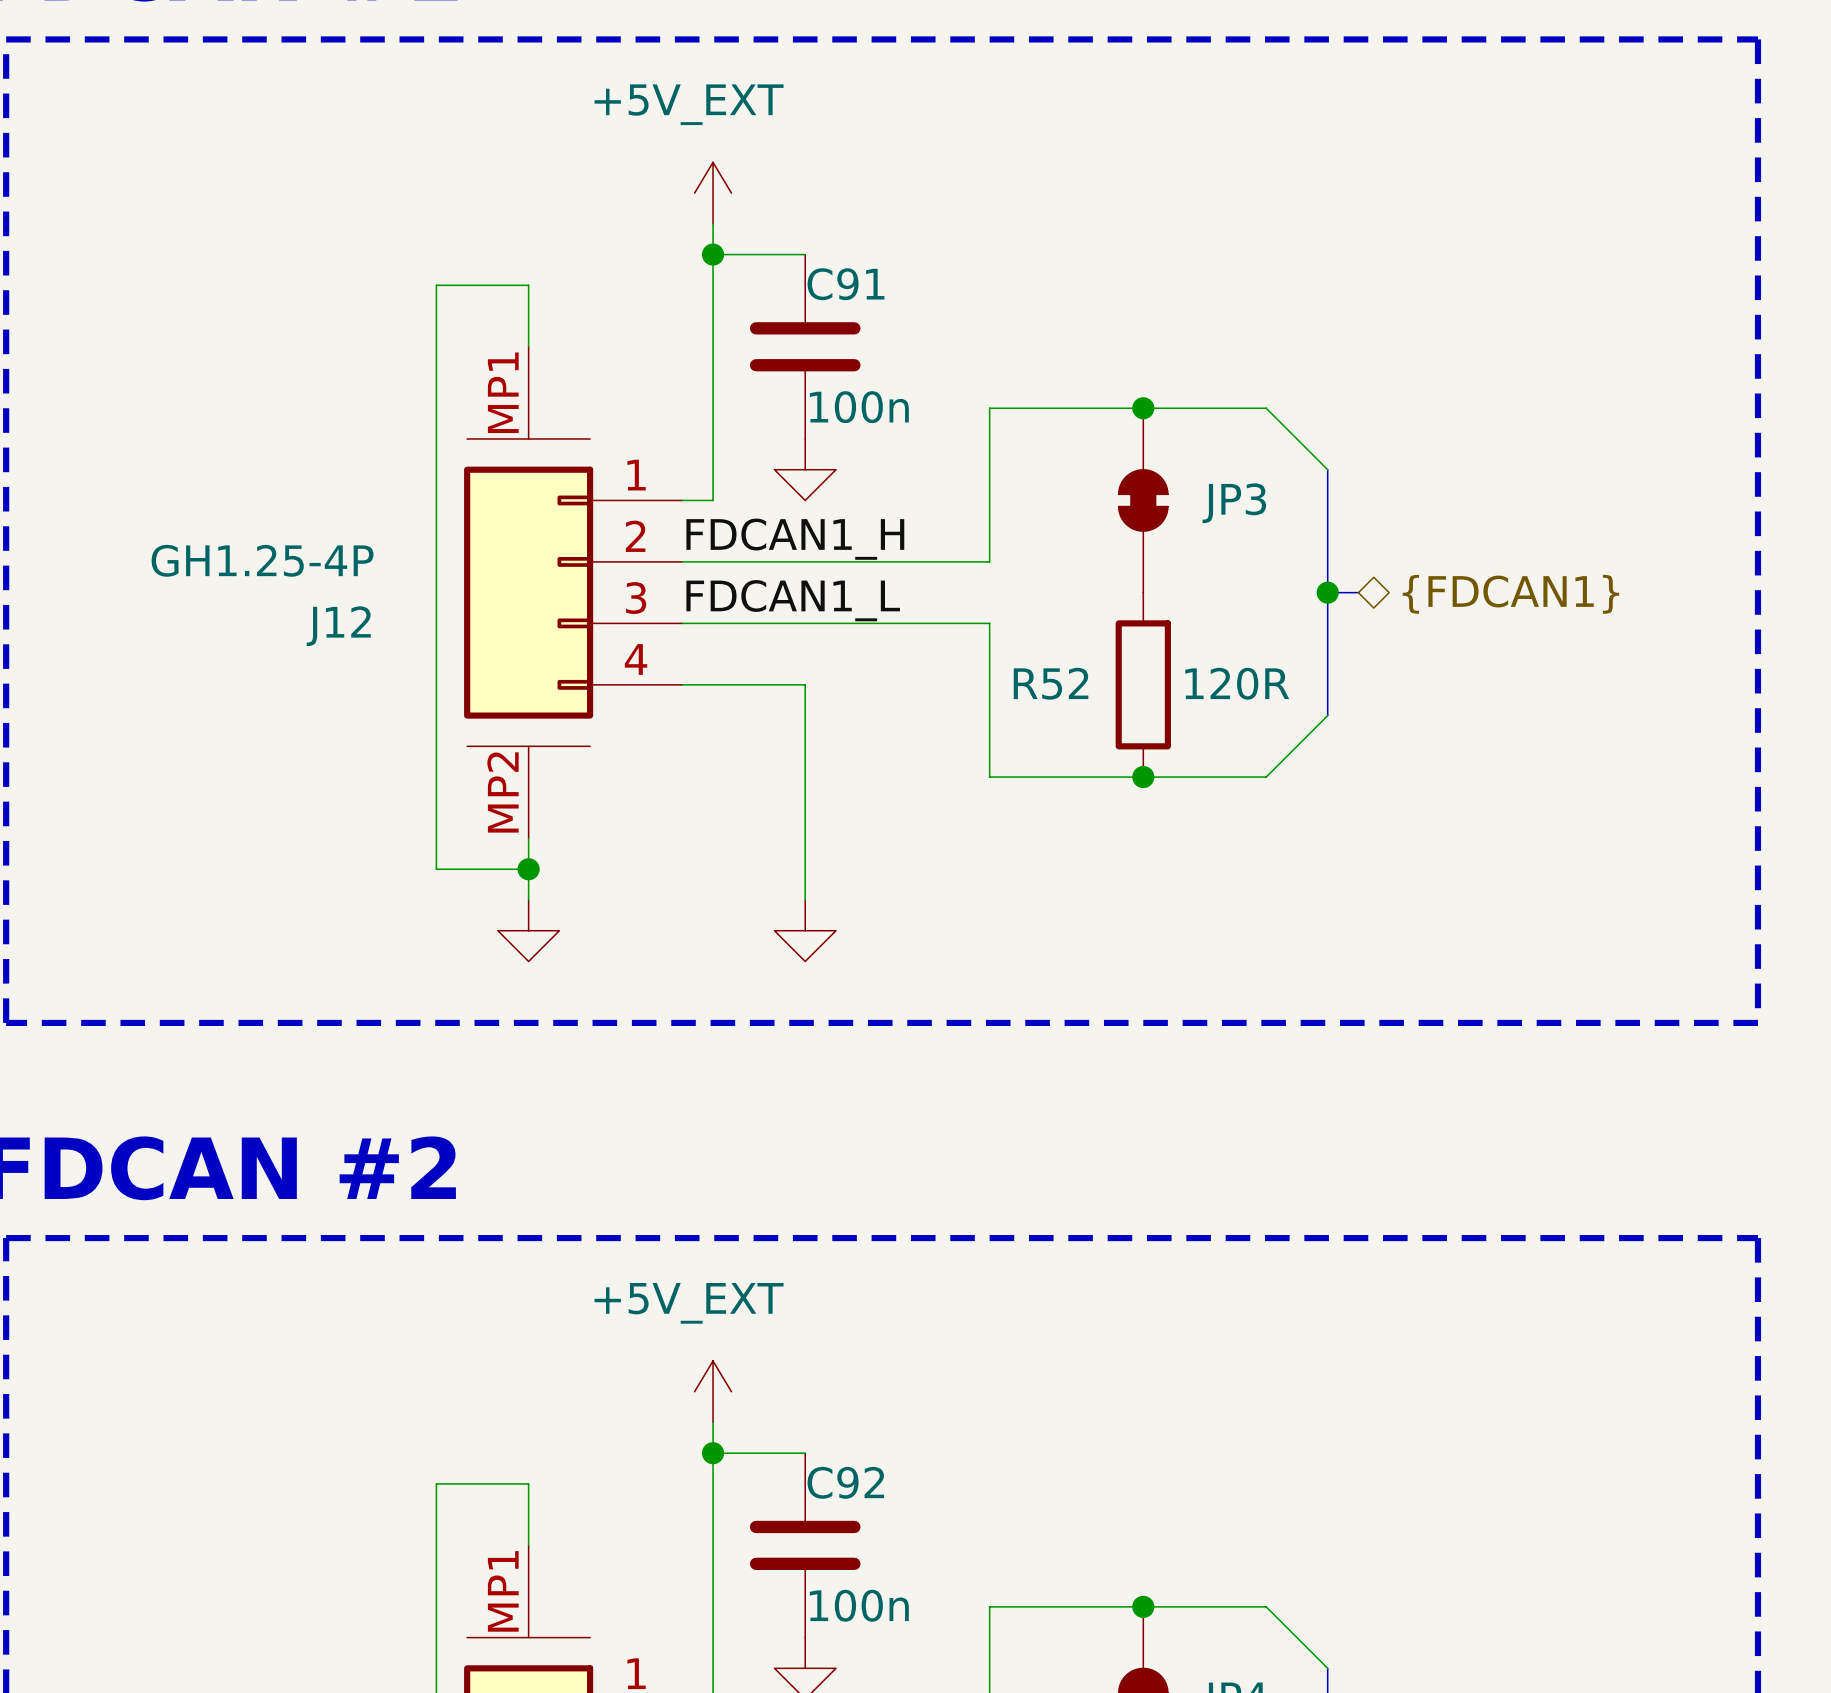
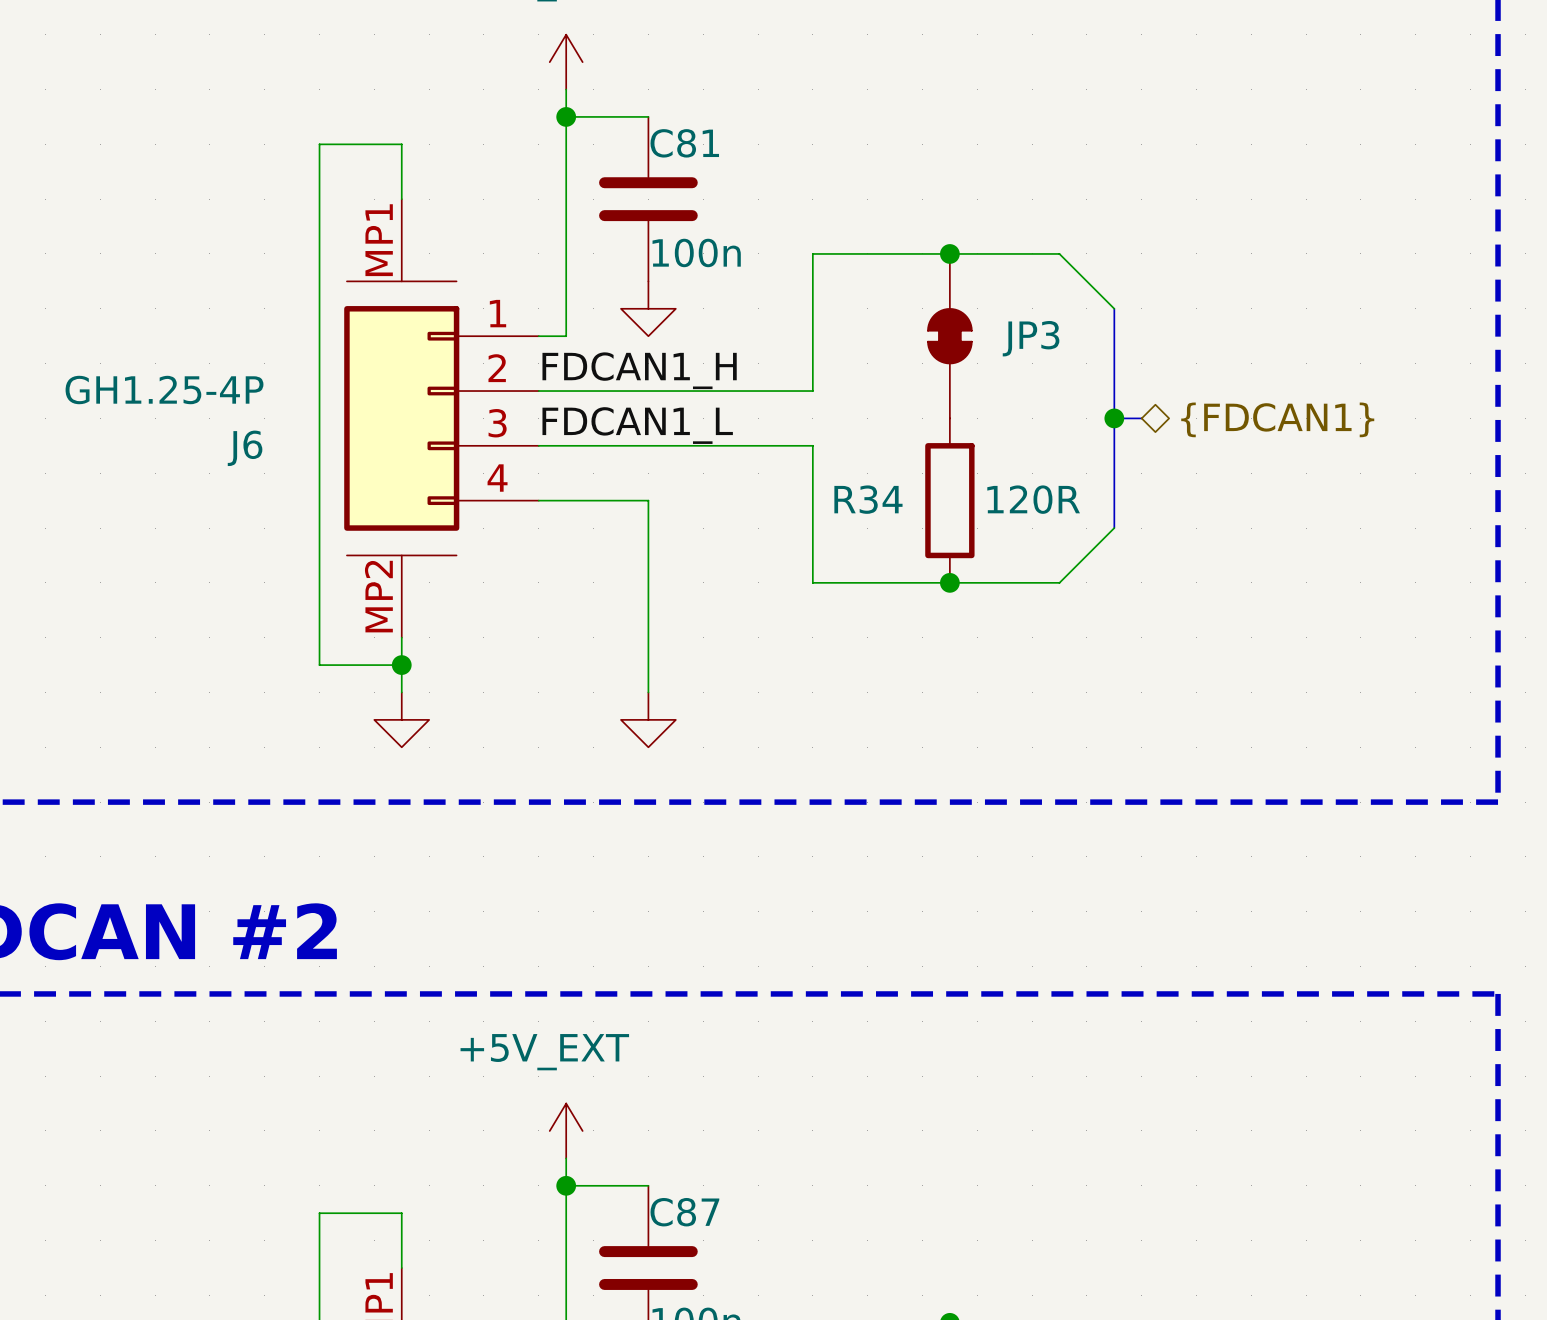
C91 name: C91 (846, 284) -> C81 (684, 143)
J12 name: J12 (338, 626) -> J6 (245, 448)
R52 name: R52 (1051, 683) -> R34 (868, 499)
C92 name: C92 (845, 1482) -> C87 (684, 1212)

